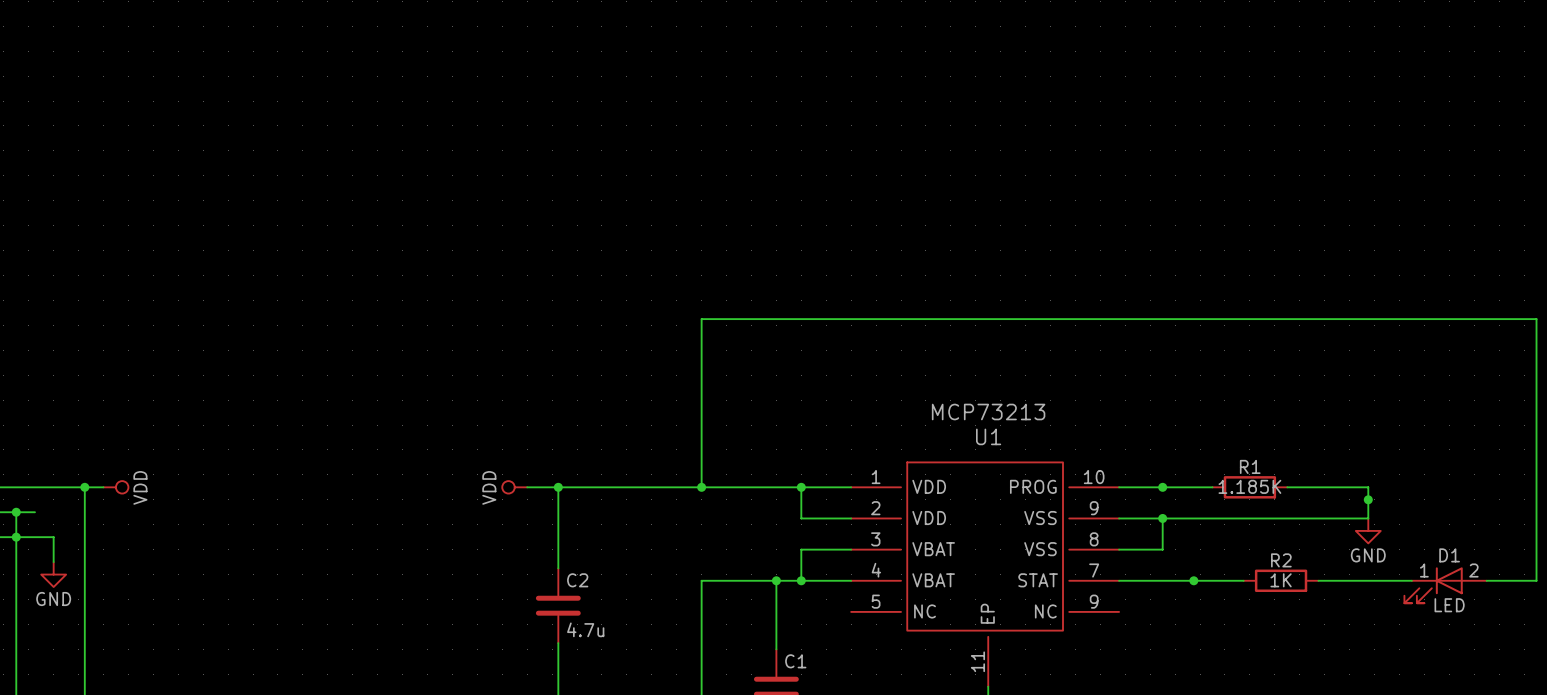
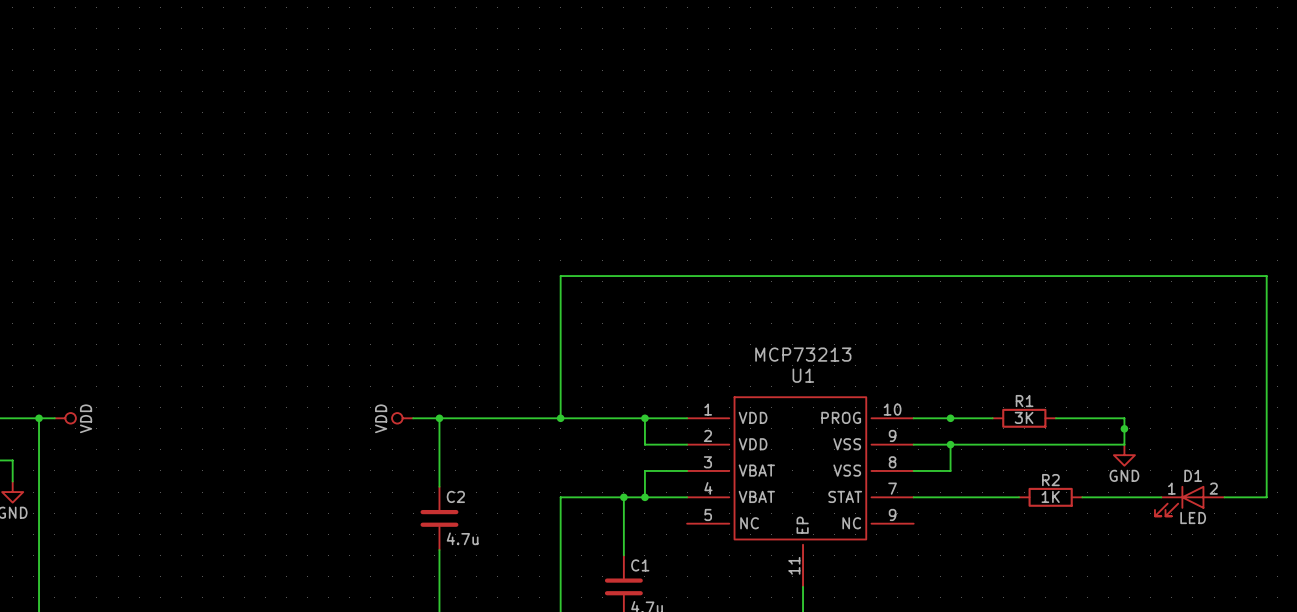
R1 value: 1.185K (1249, 486) -> 3K (1024, 417)
junction: (1193, 580) -> none

